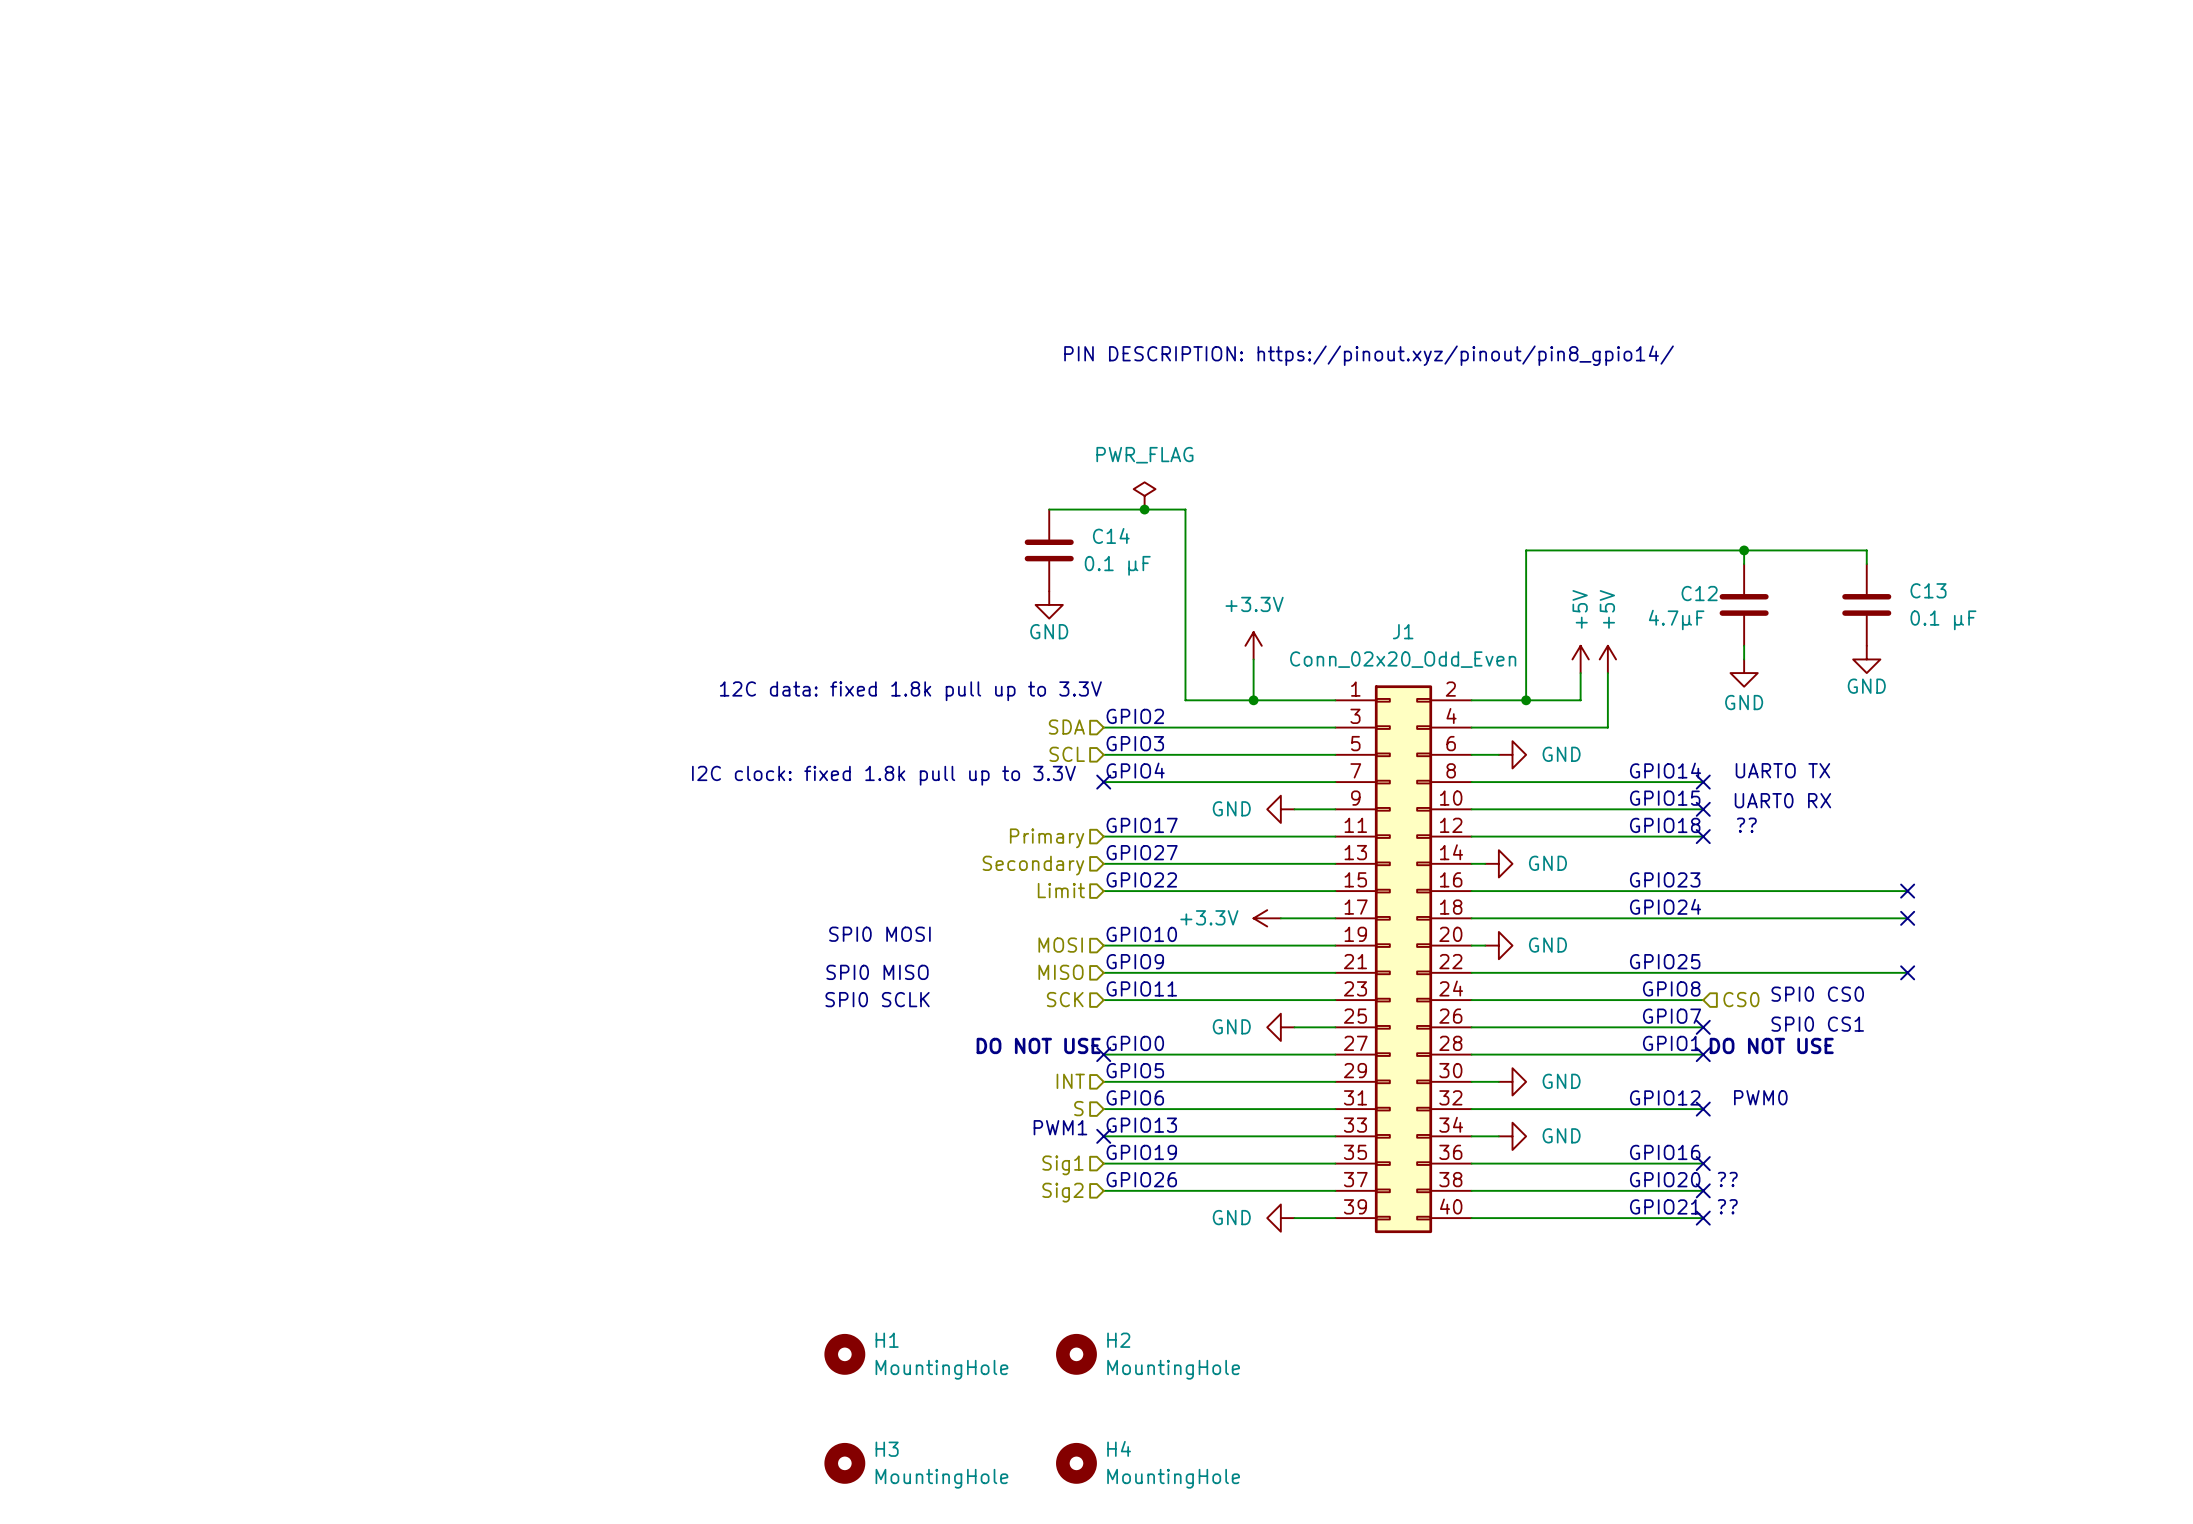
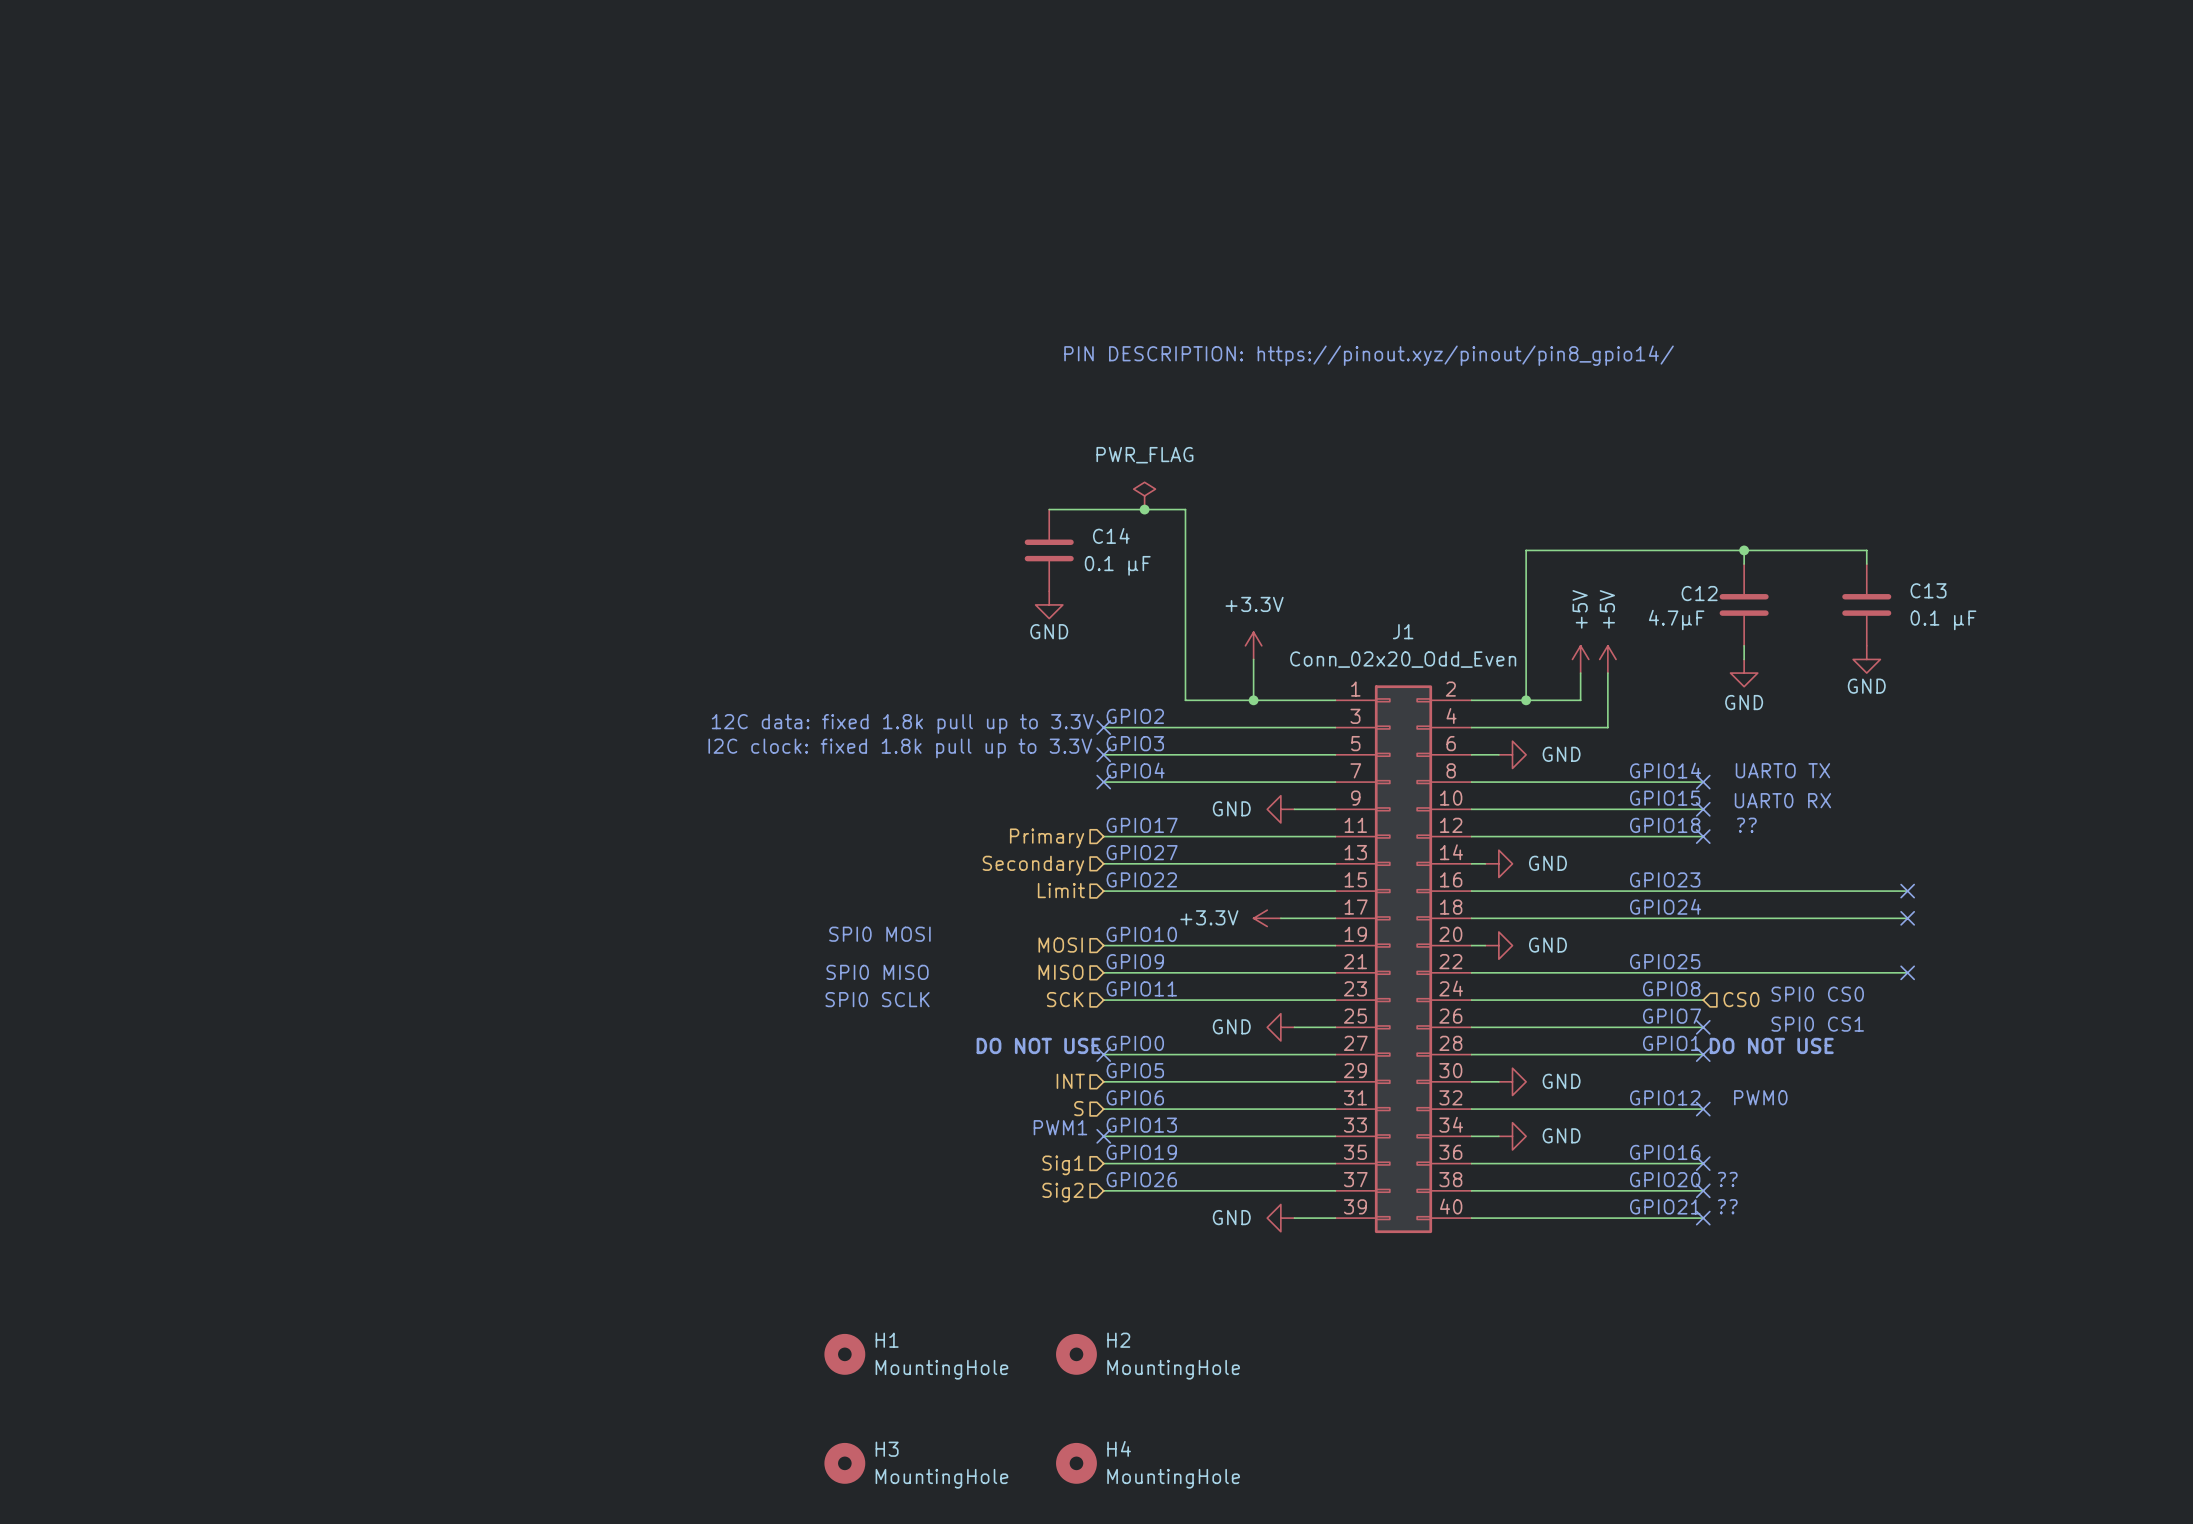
text position: 12C data: fixed 1.8k pull up to 3.3V (910, 691) -> 12C data: fixed 1.8k pull up to 3.3V (902, 723)
hierarchical label: SDA (1066, 727) -> none
no-connect mark: none -> (1103, 727)
hierarchical label: SCL (1067, 754) -> none
no-connect mark: none -> (1103, 754)
text position: I2C clock: fixed 1.8k pull up to 3.3V (883, 775) -> I2C clock: fixed 1.8k pull up to 3.3V (900, 748)

